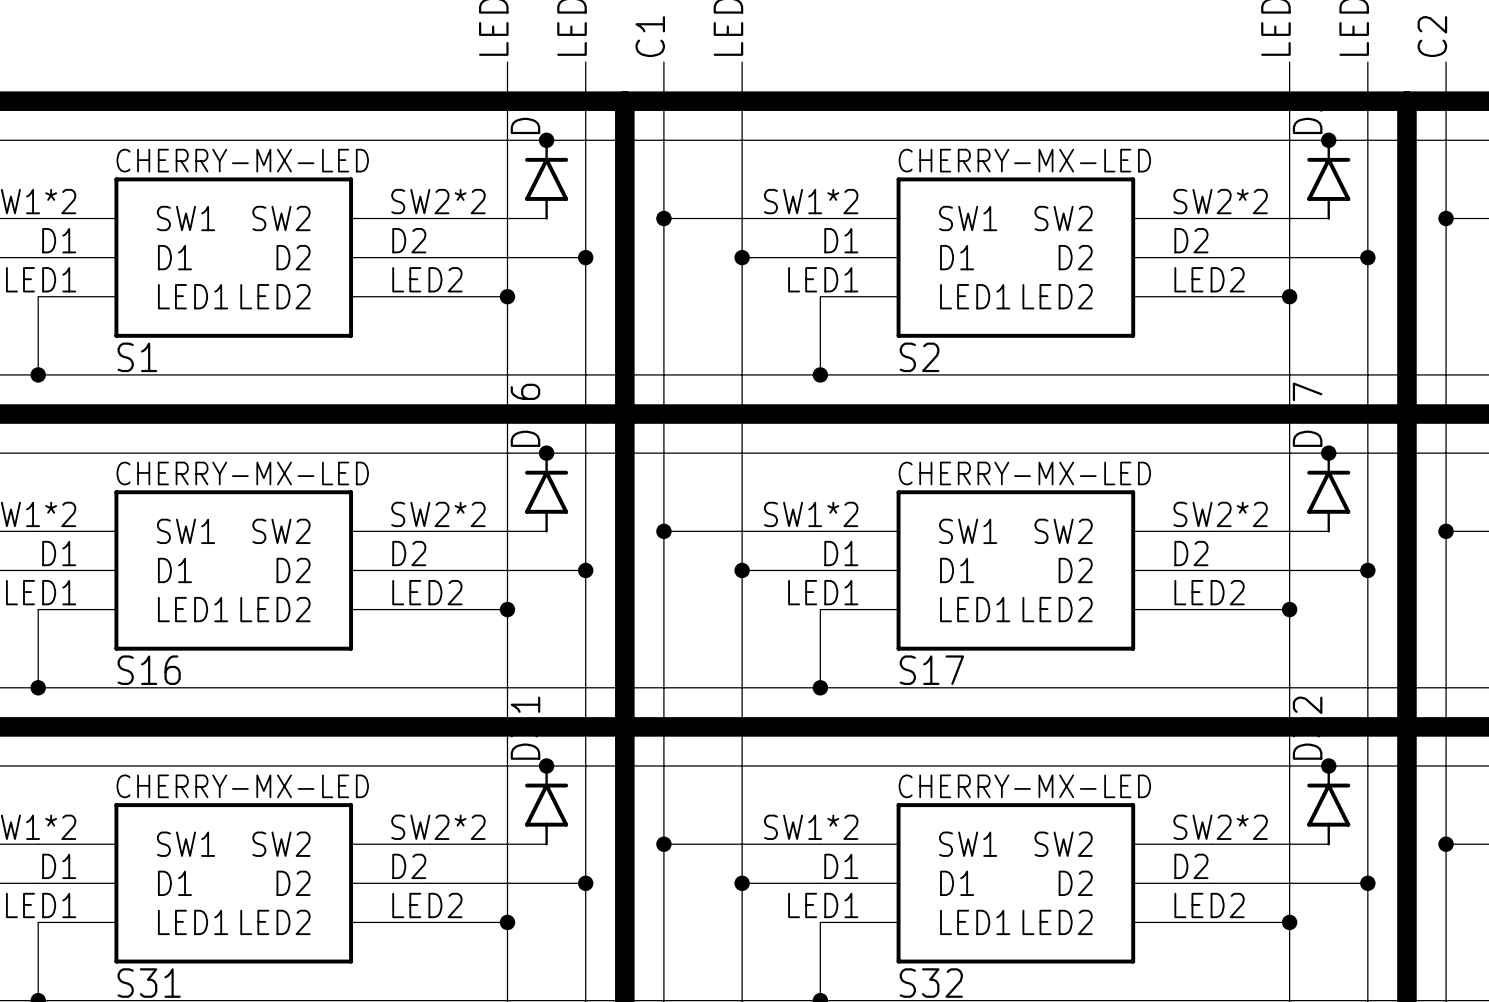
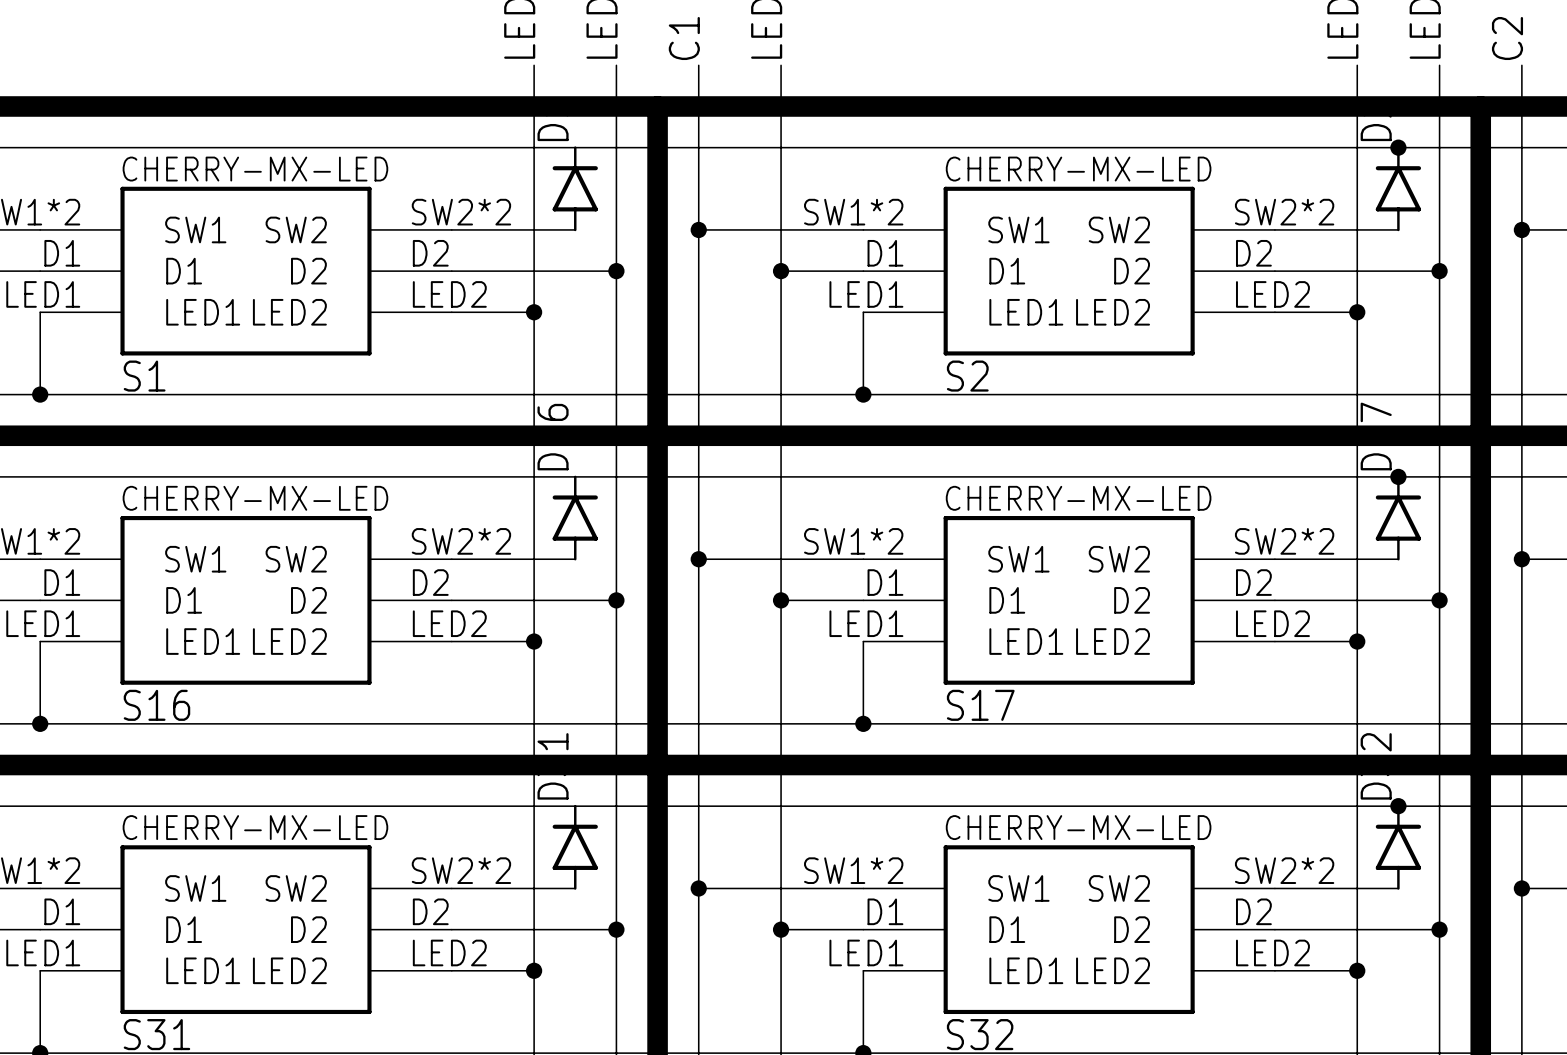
junction: (546, 140) -> none
junction: (546, 453) -> none
junction: (546, 766) -> none

